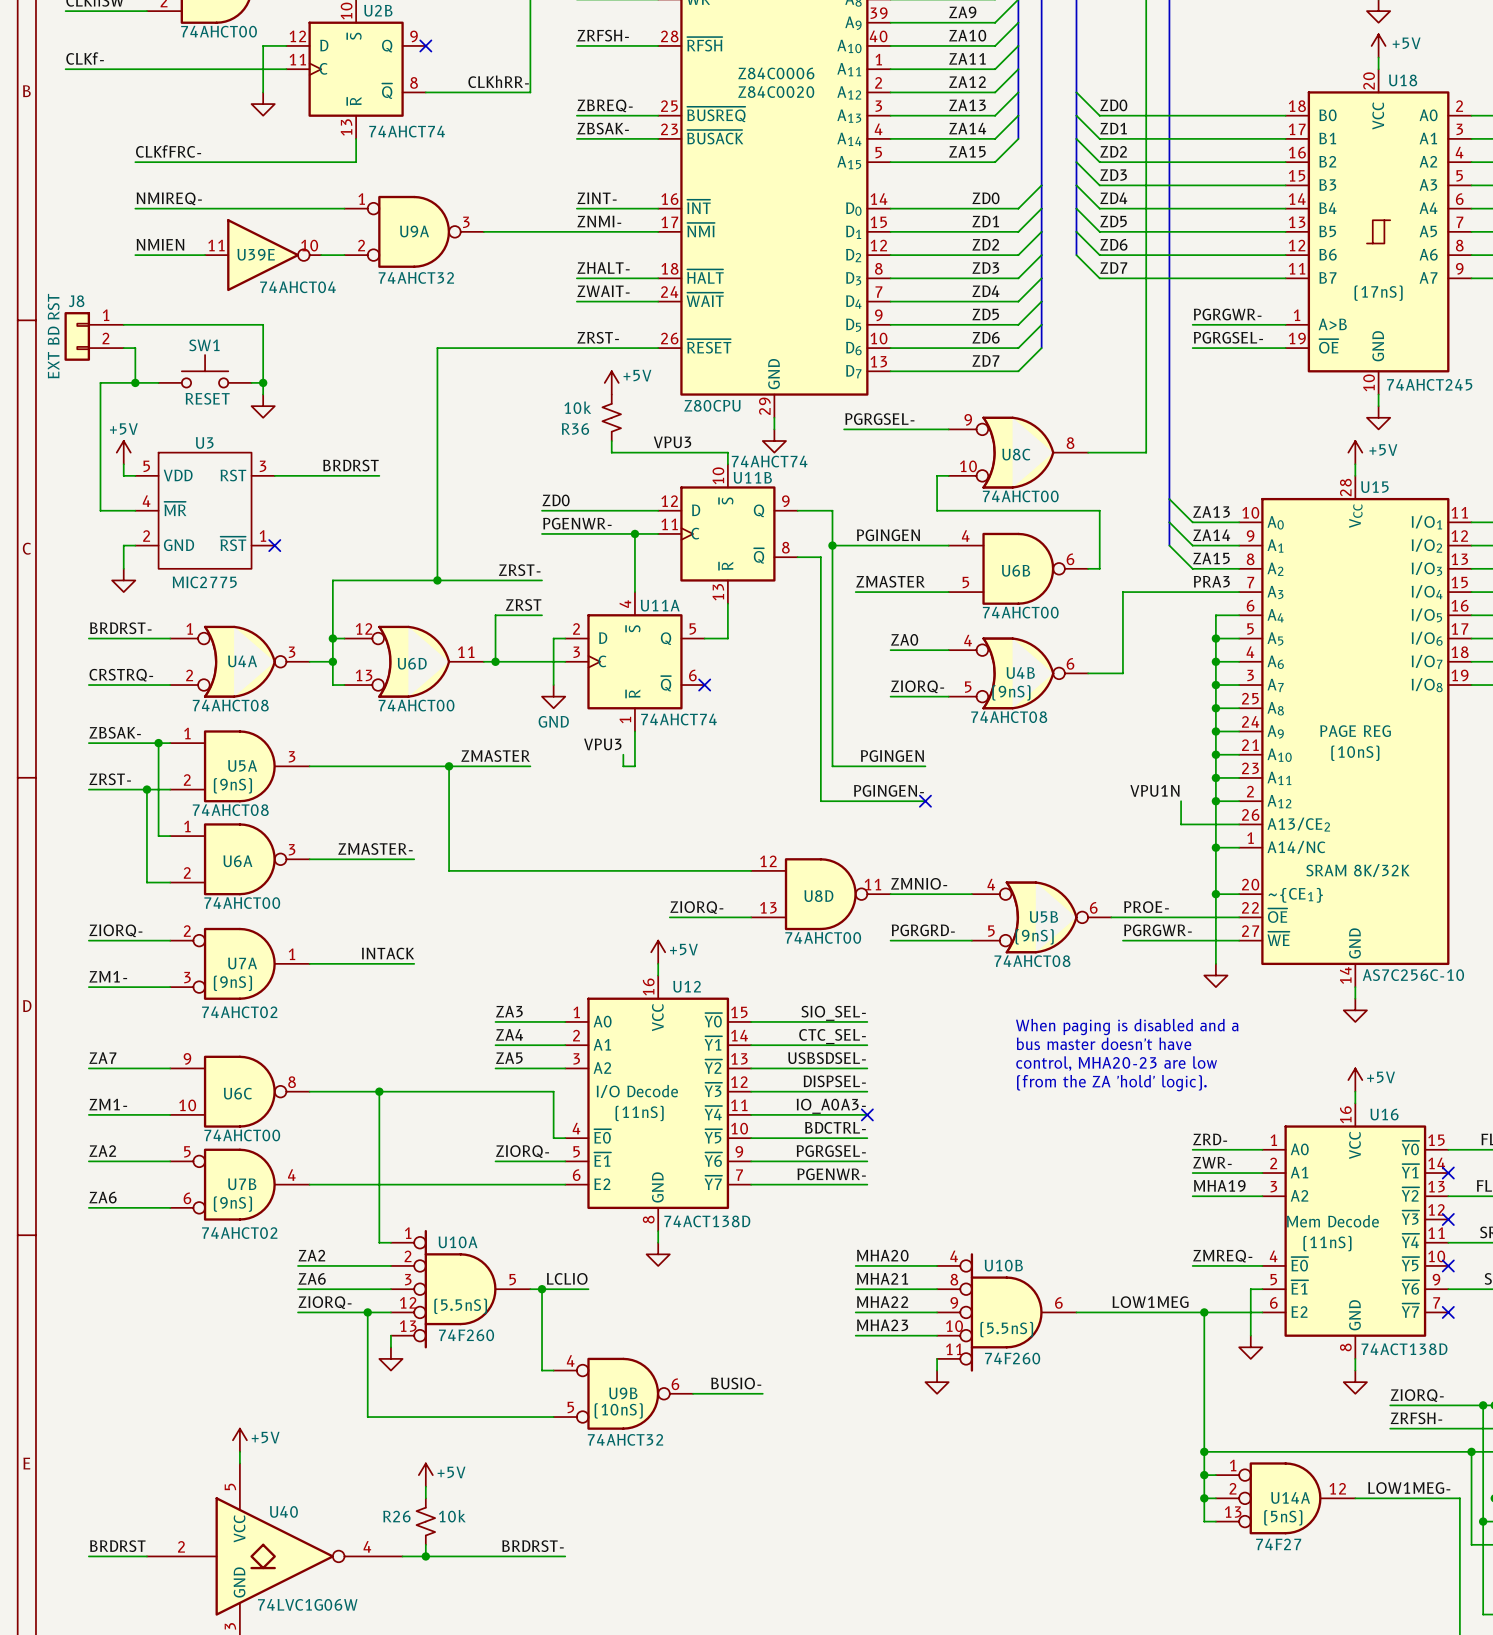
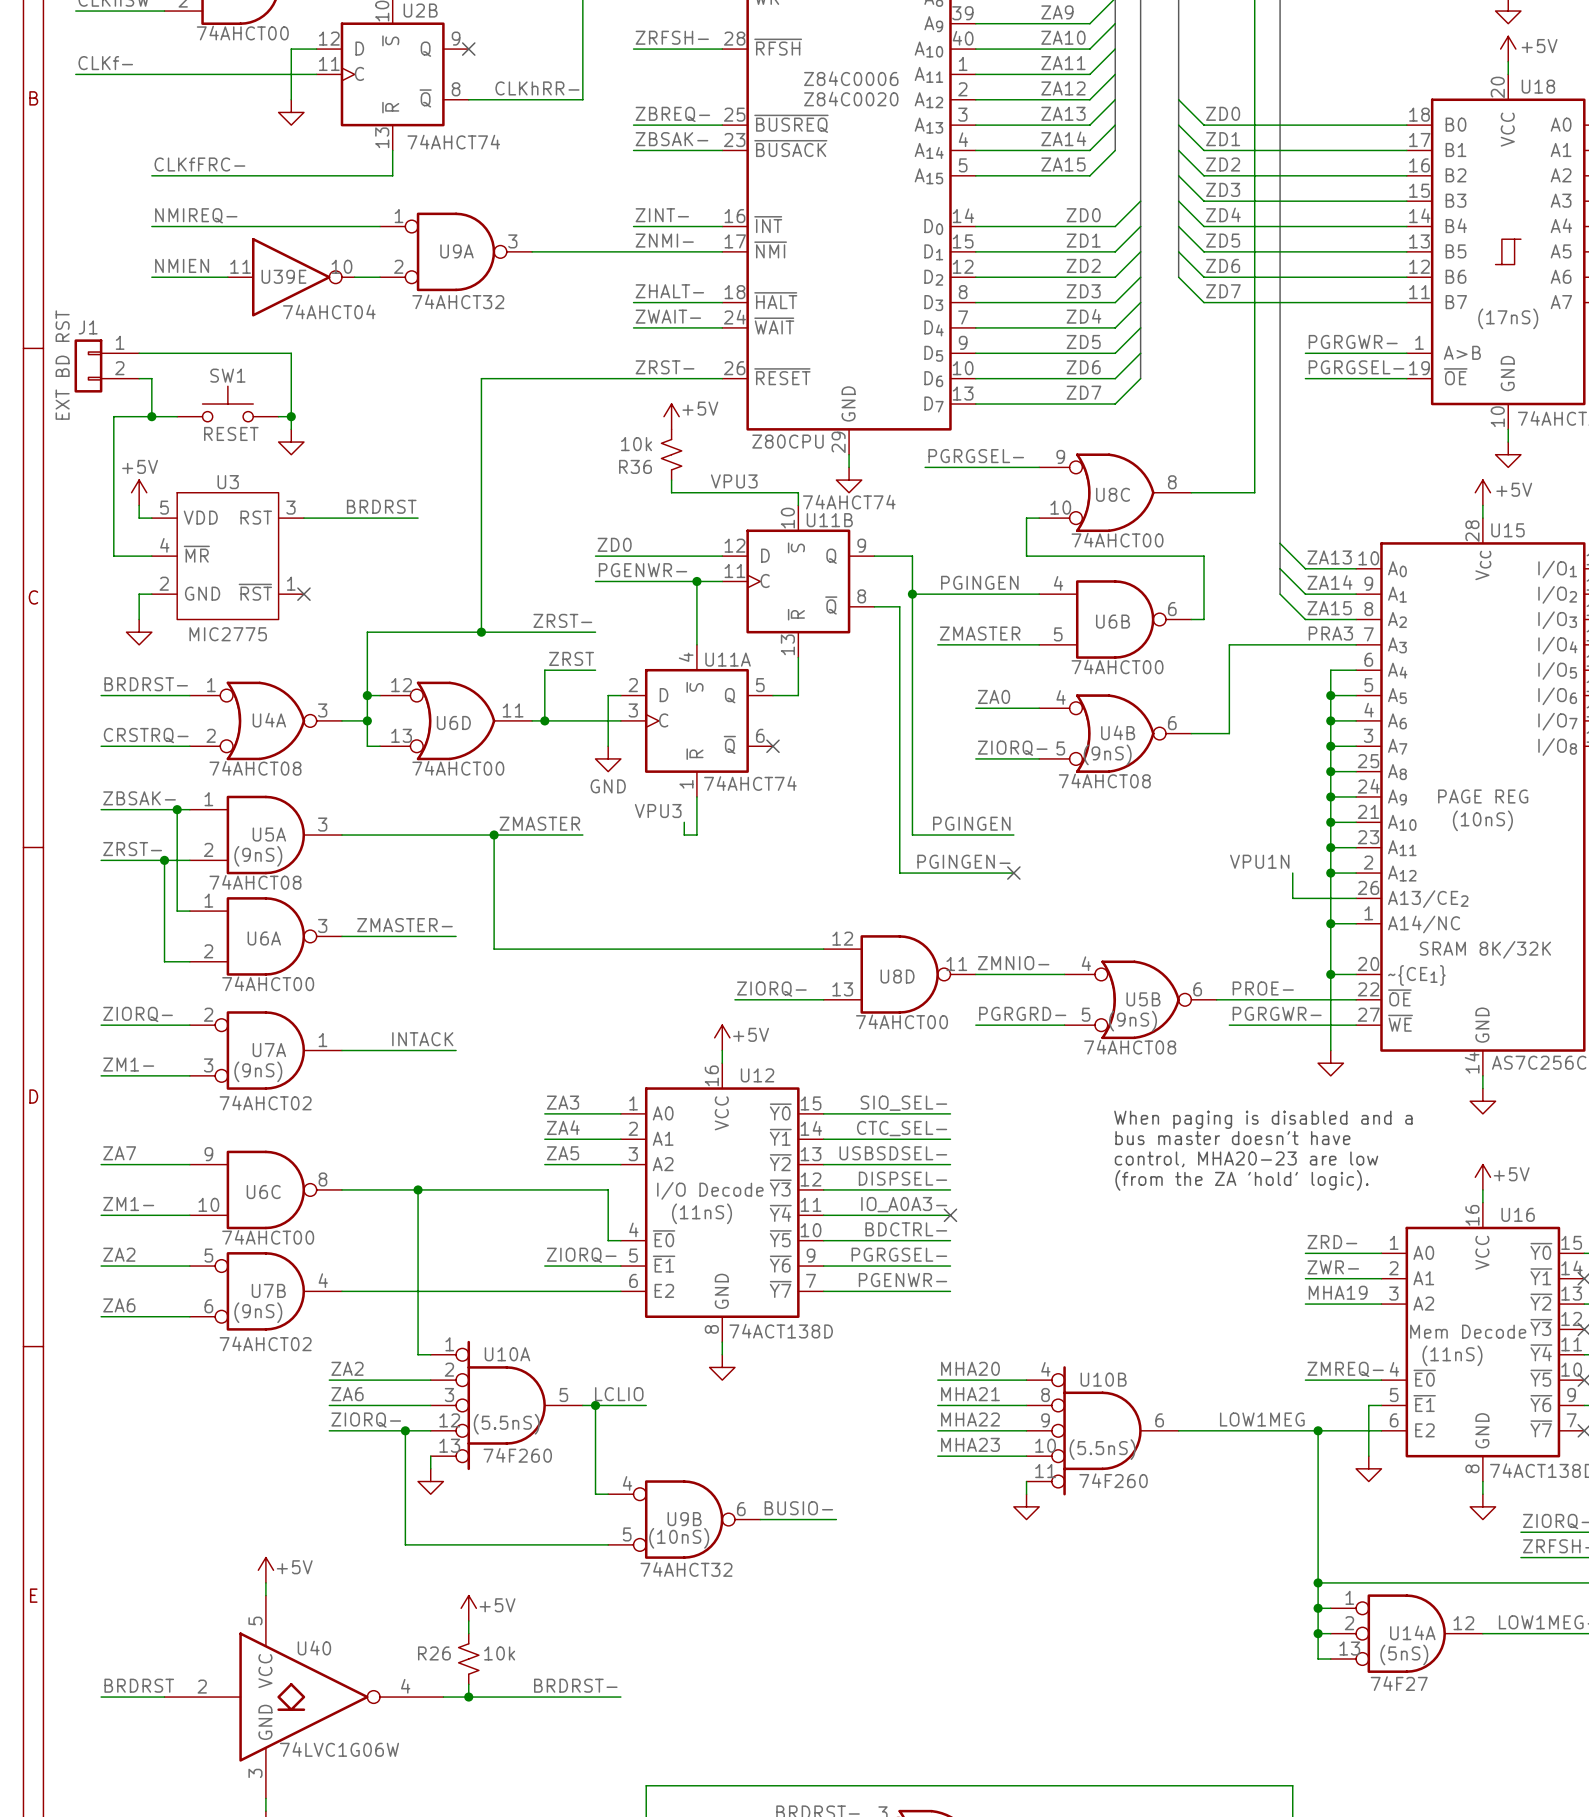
J8 name: J8 (76, 301) -> J1 (88, 327)

